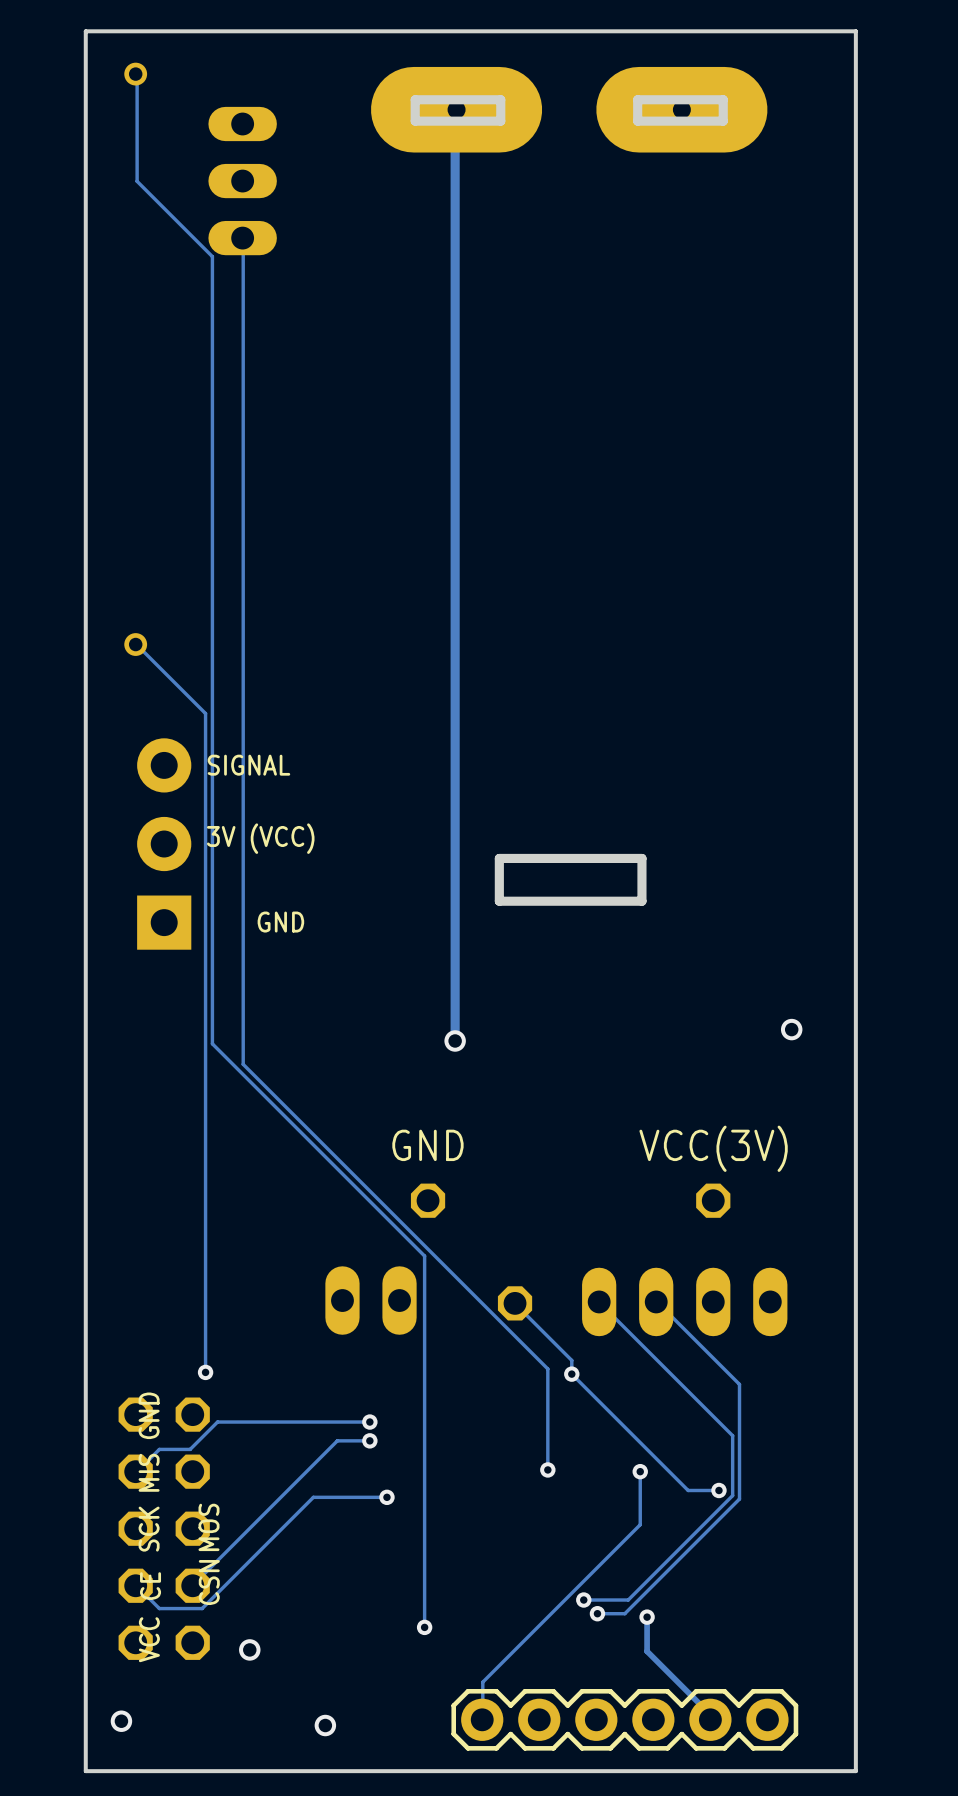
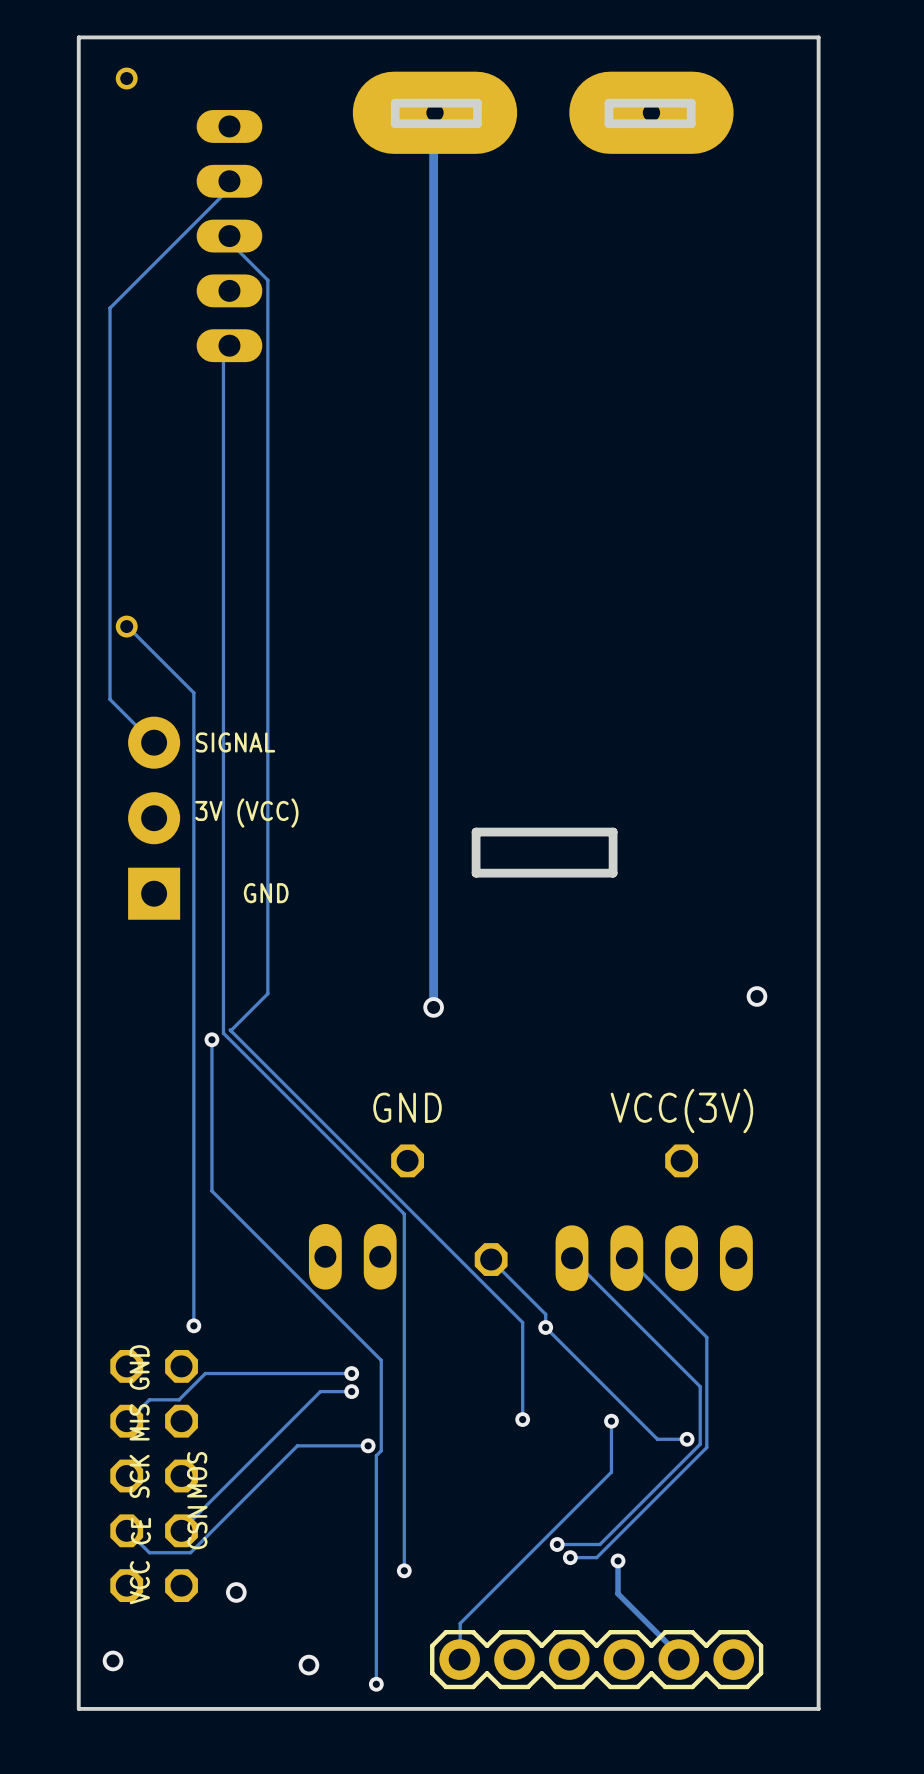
track: (135, 74) (137, 181) (212, 256) (212, 1043) (236, 1067) -> (229, 345) (223, 350) (223, 1033)
track: none -> (229, 181) (228, 189) (110, 308) (110, 699) (154, 742)
track: none -> (229, 236) (230, 242) (267, 280) (267, 993) (230, 1030)
track: (243, 242) (243, 1064) -> none
part: none -> (229, 318)
track: none -> (211, 1039) (211, 1191) (381, 1360) (381, 1450) (376, 1455) (376, 1684)
via: none -> (211, 1039)
via: none -> (376, 1684)

